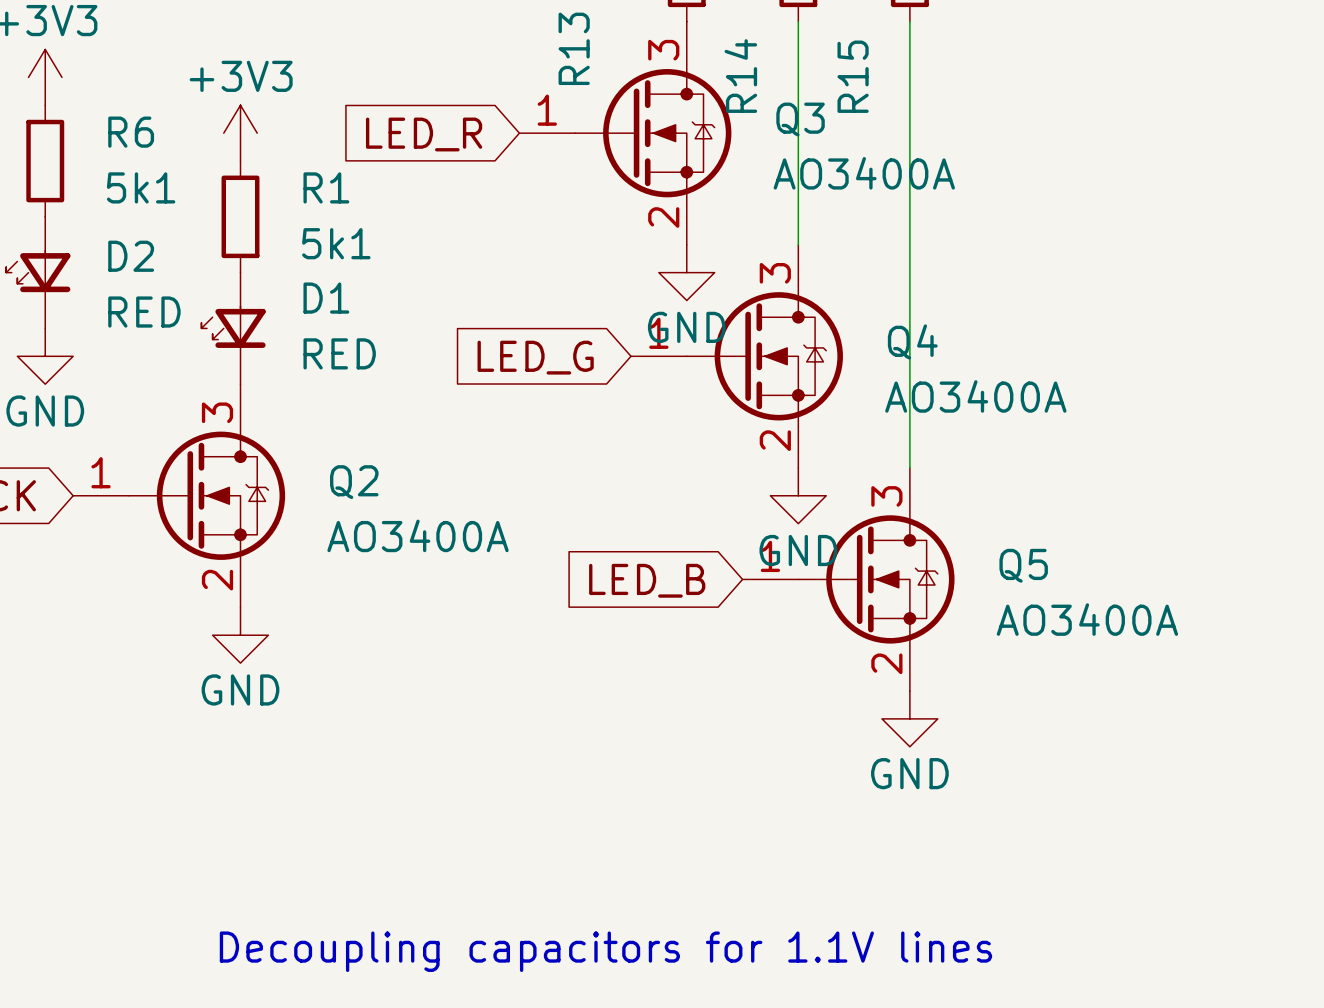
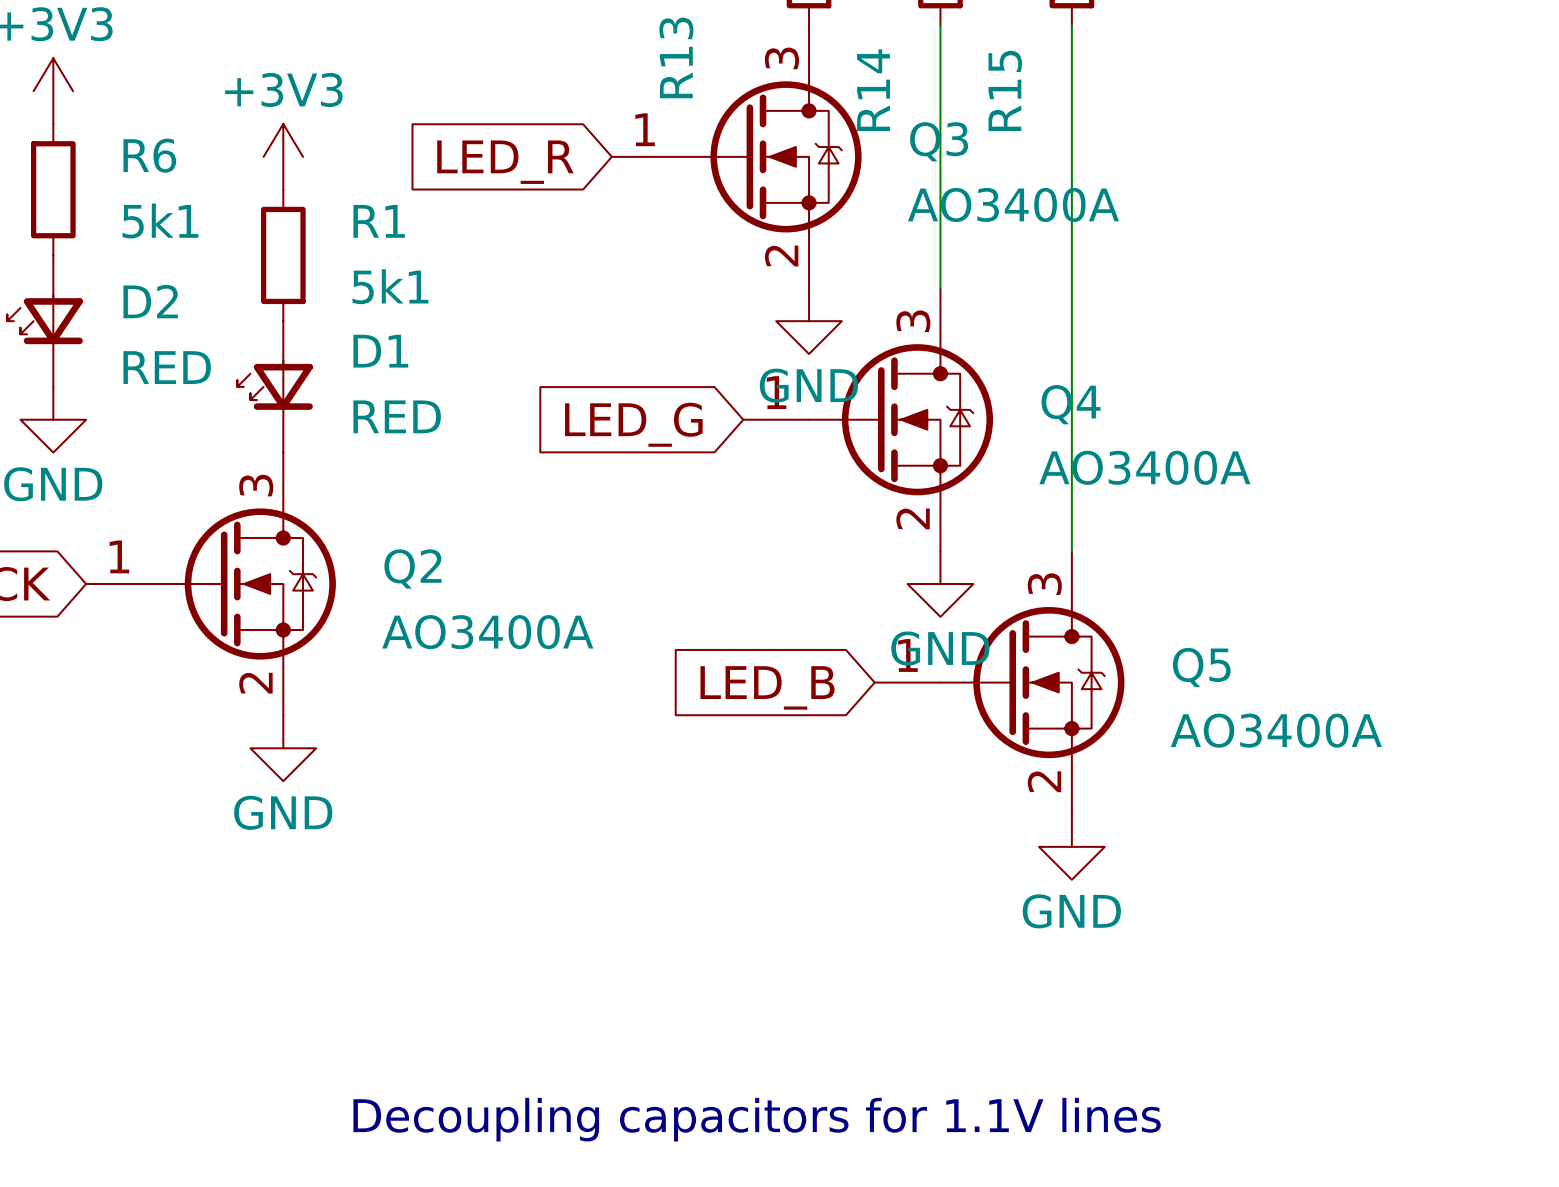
text position: Decoupling capacitors for 1.1V lines (605, 951) -> Decoupling capacitors for 1.1V lines (757, 1119)

